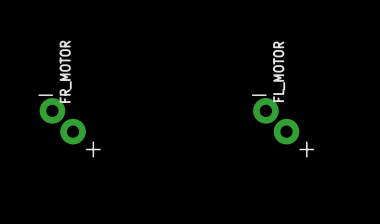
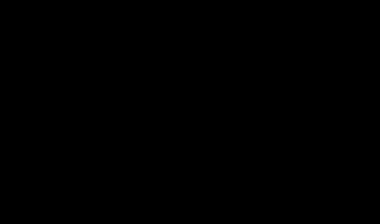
FR_MOTOR: (62, 121) -> none
FL_MOTOR: (276, 121) -> none

